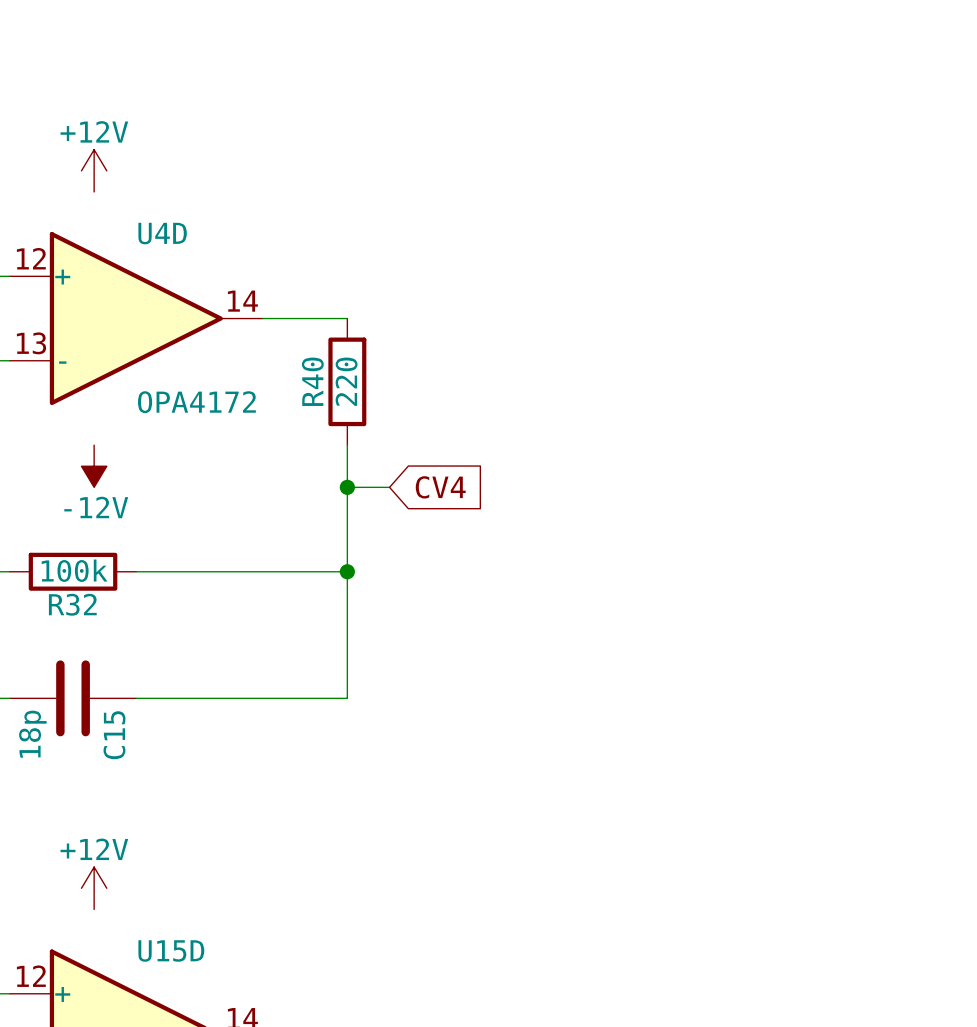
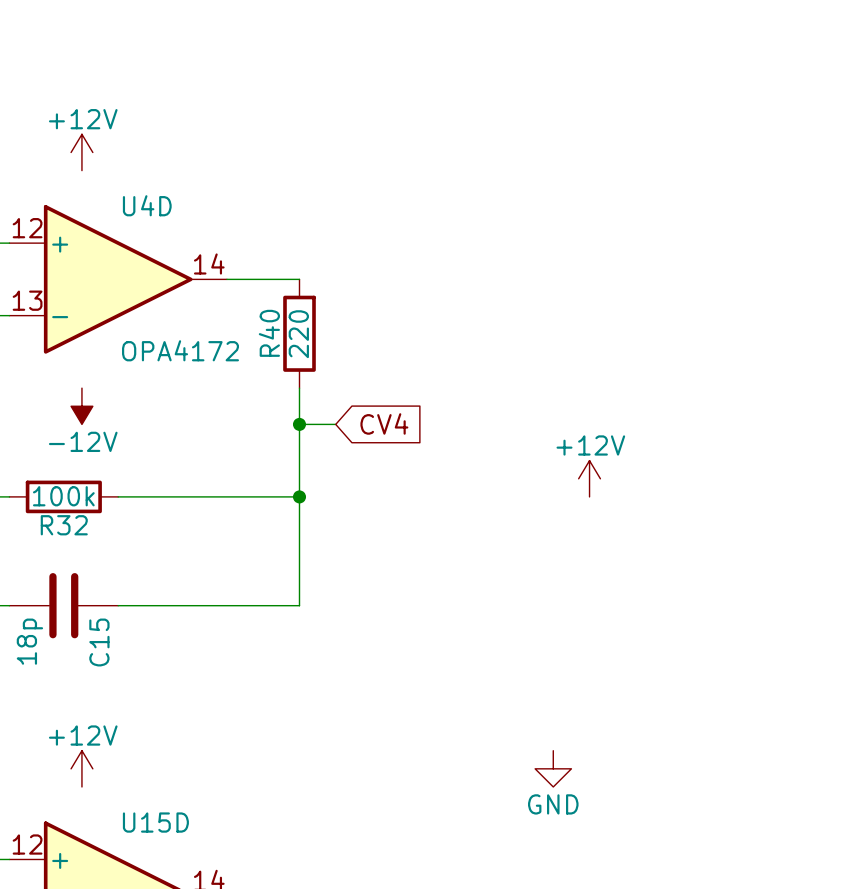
power symbol: none -> +12V (589, 478)
power symbol: none -> GND (553, 768)

